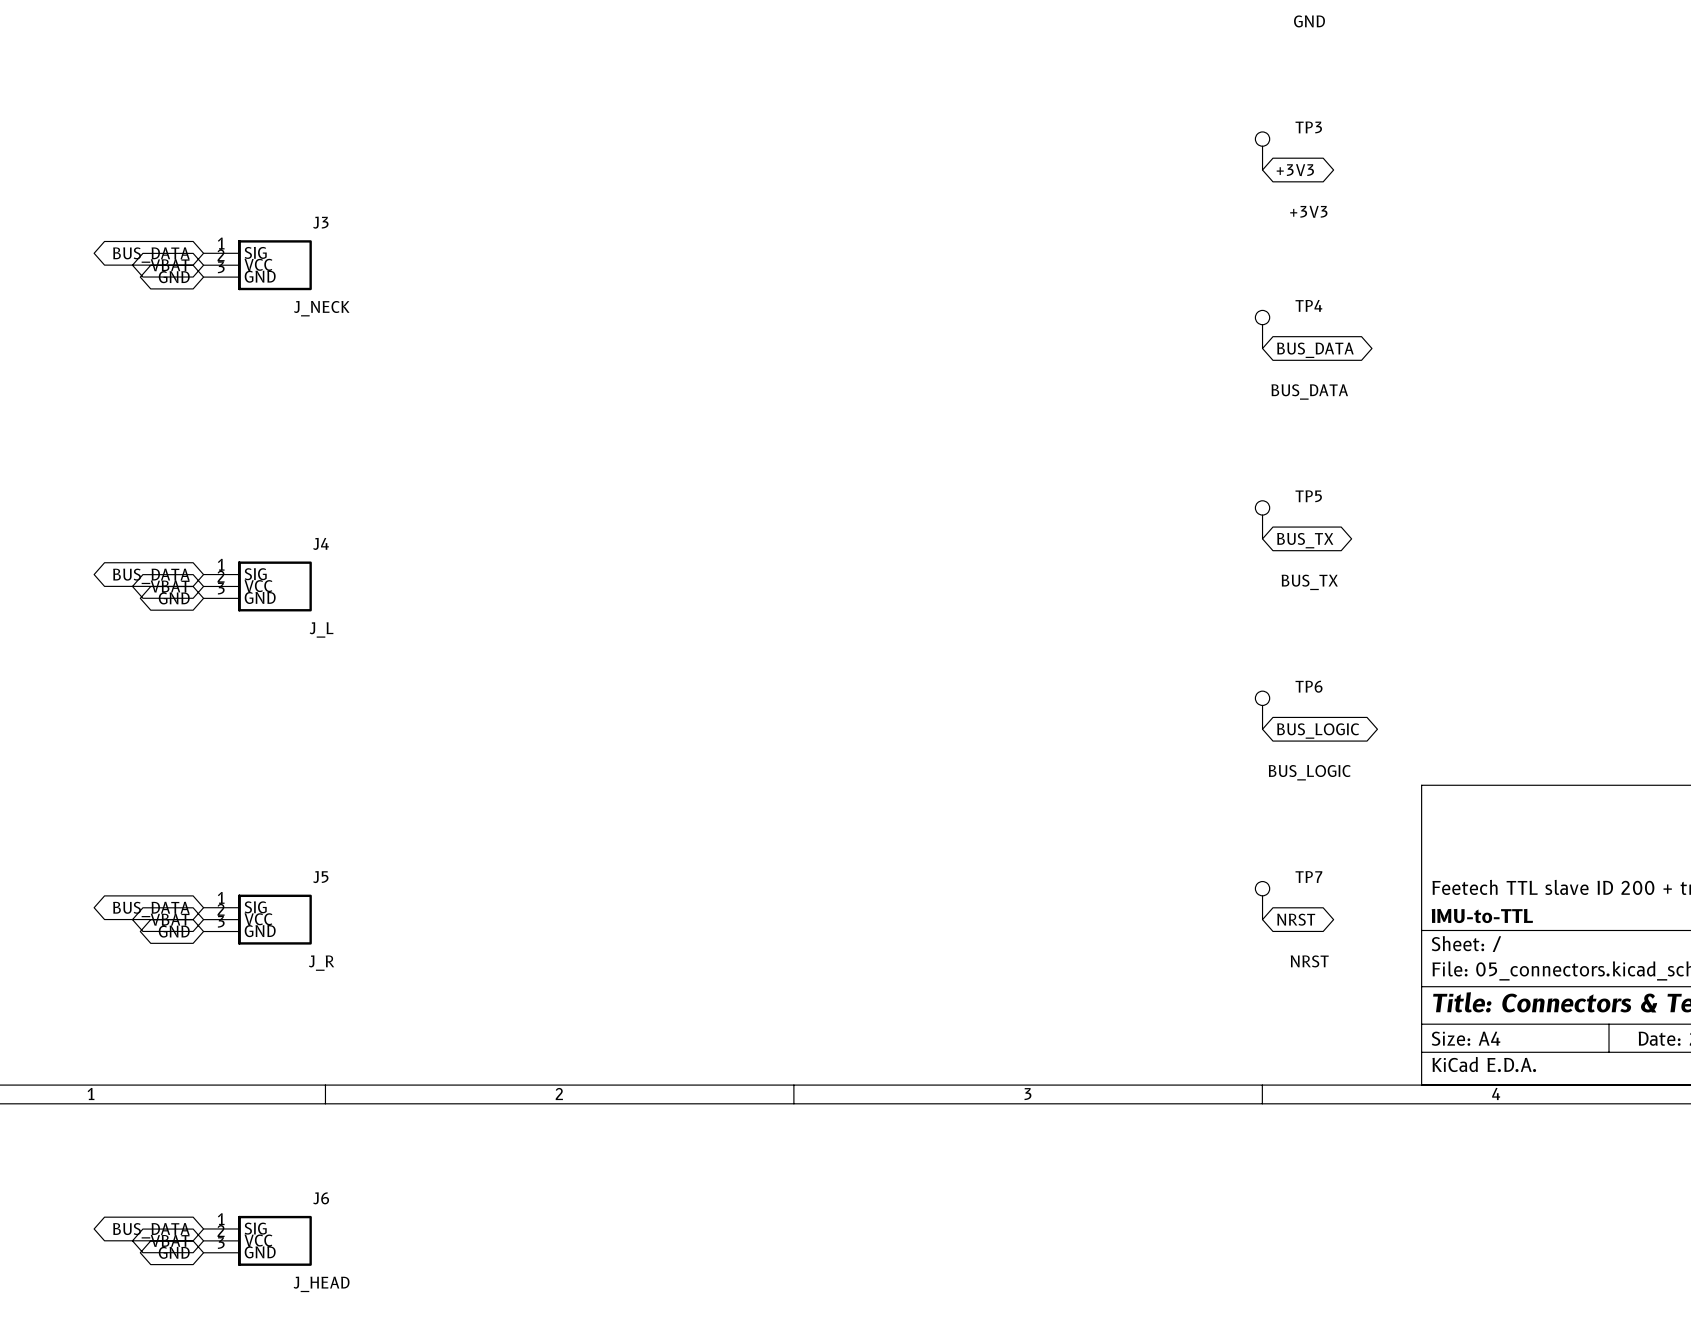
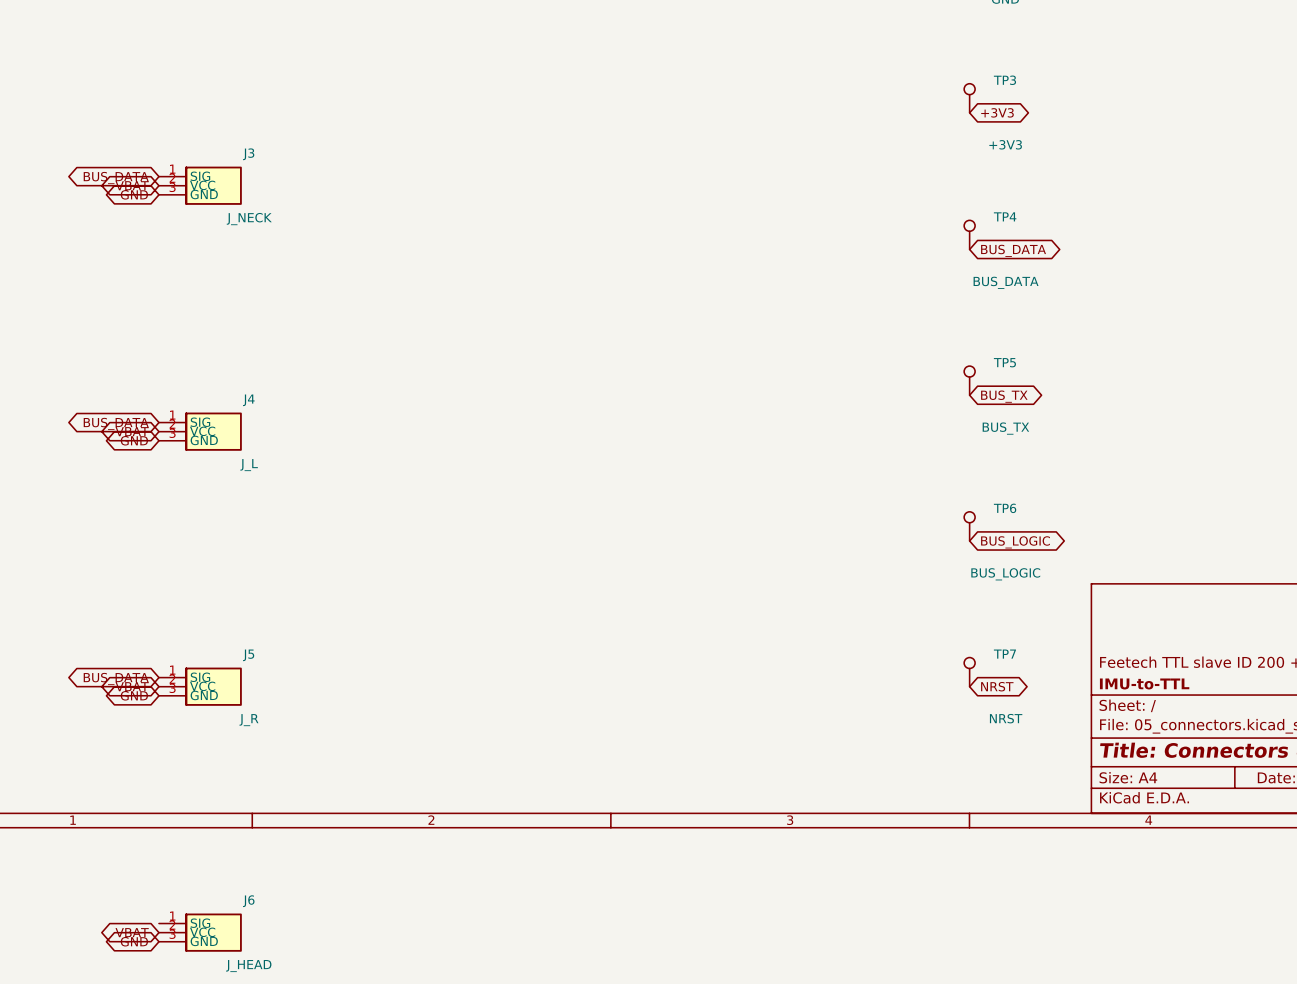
global label: BUS_DATA (151, 1230) -> none

